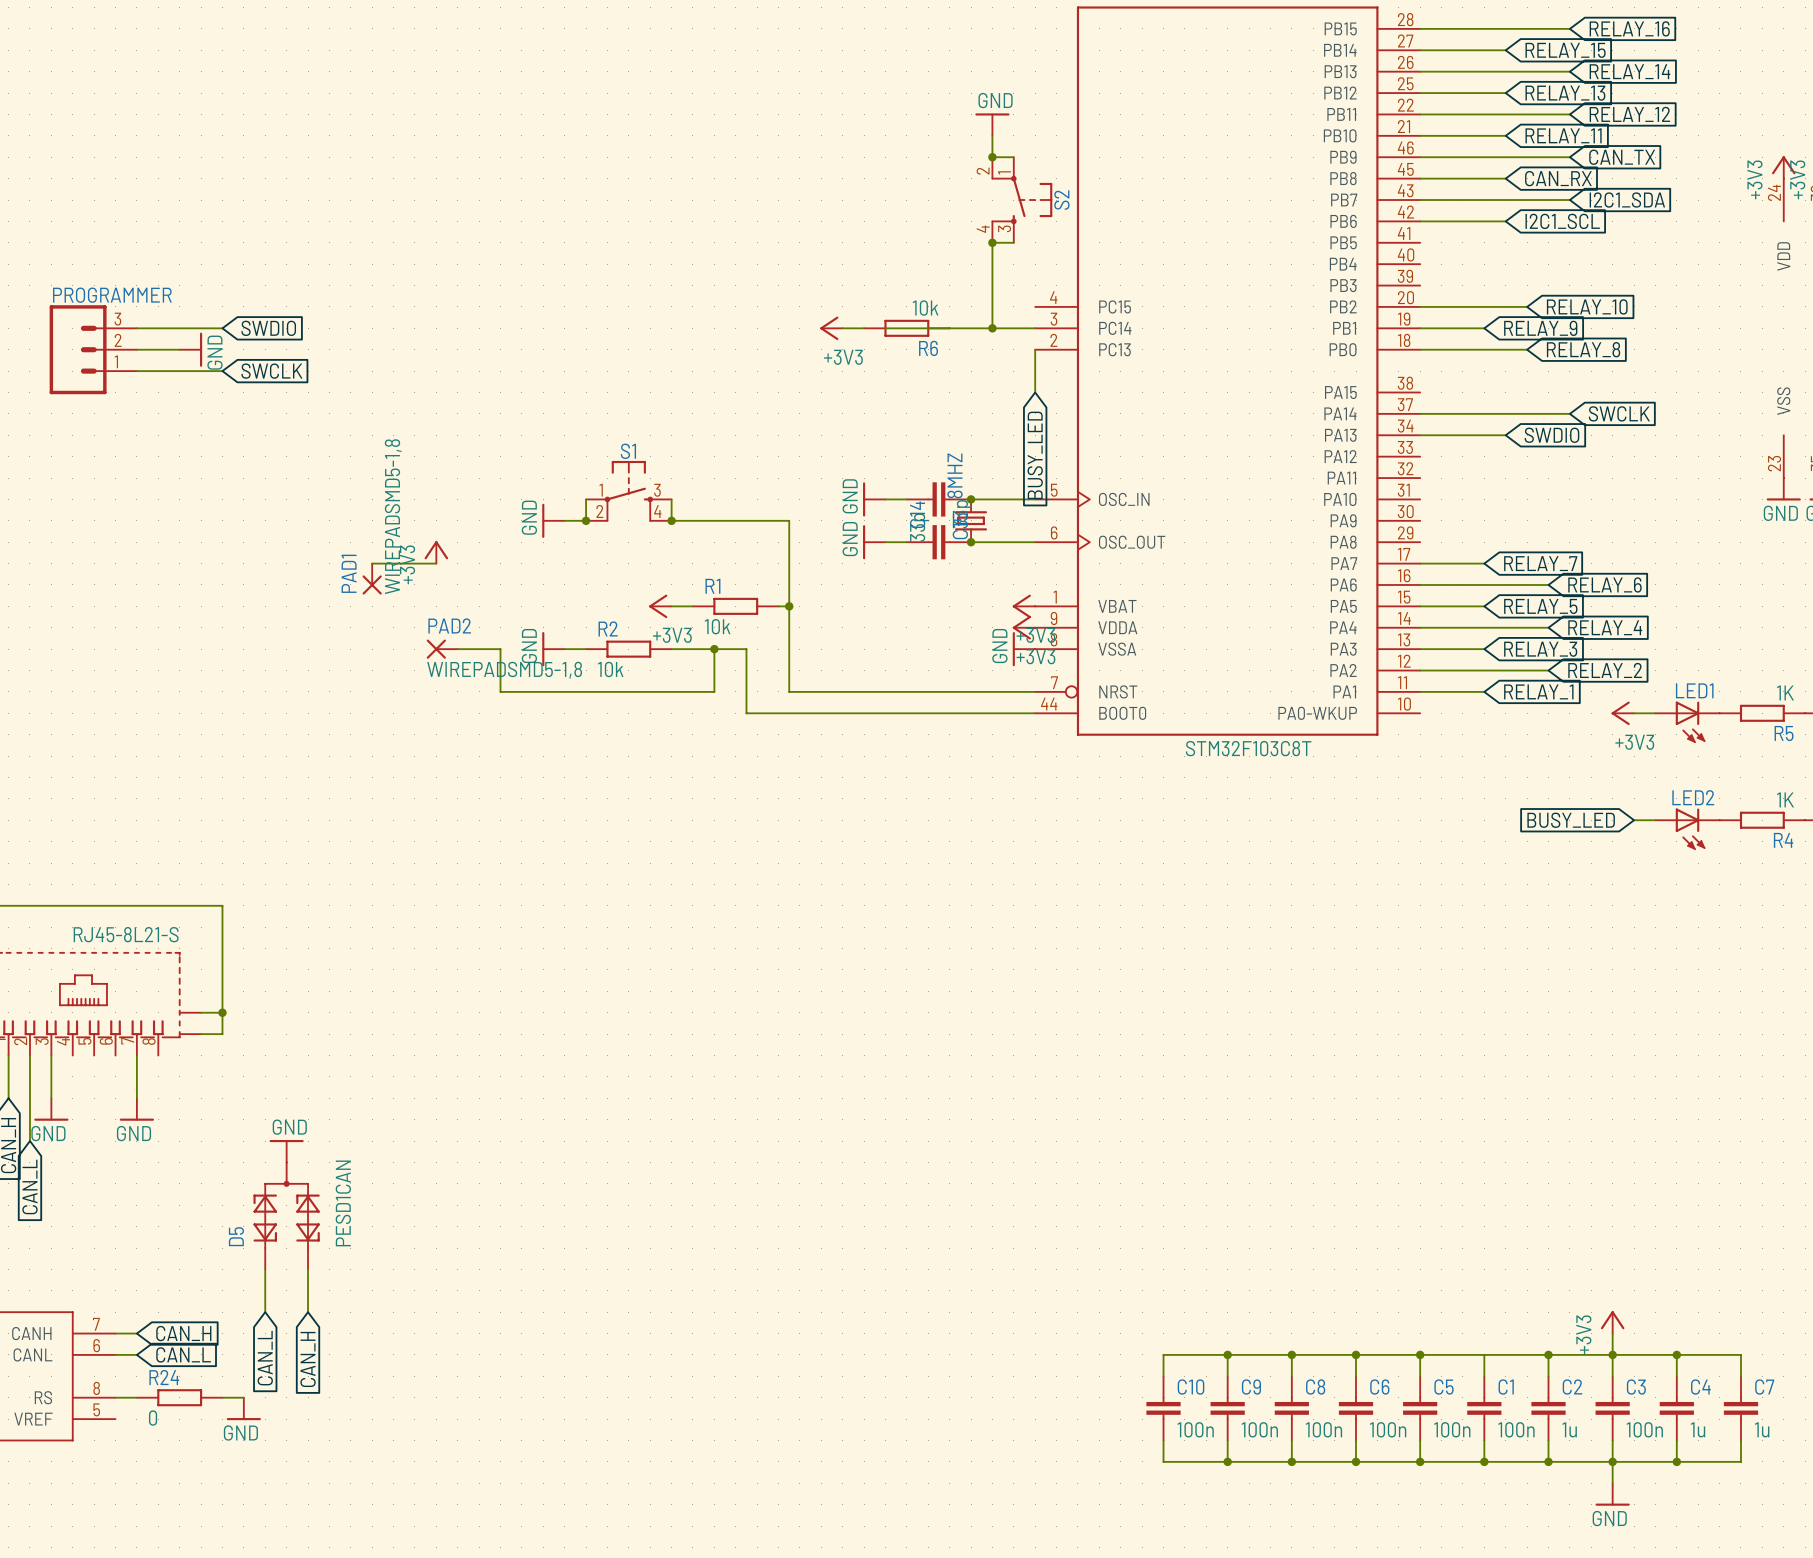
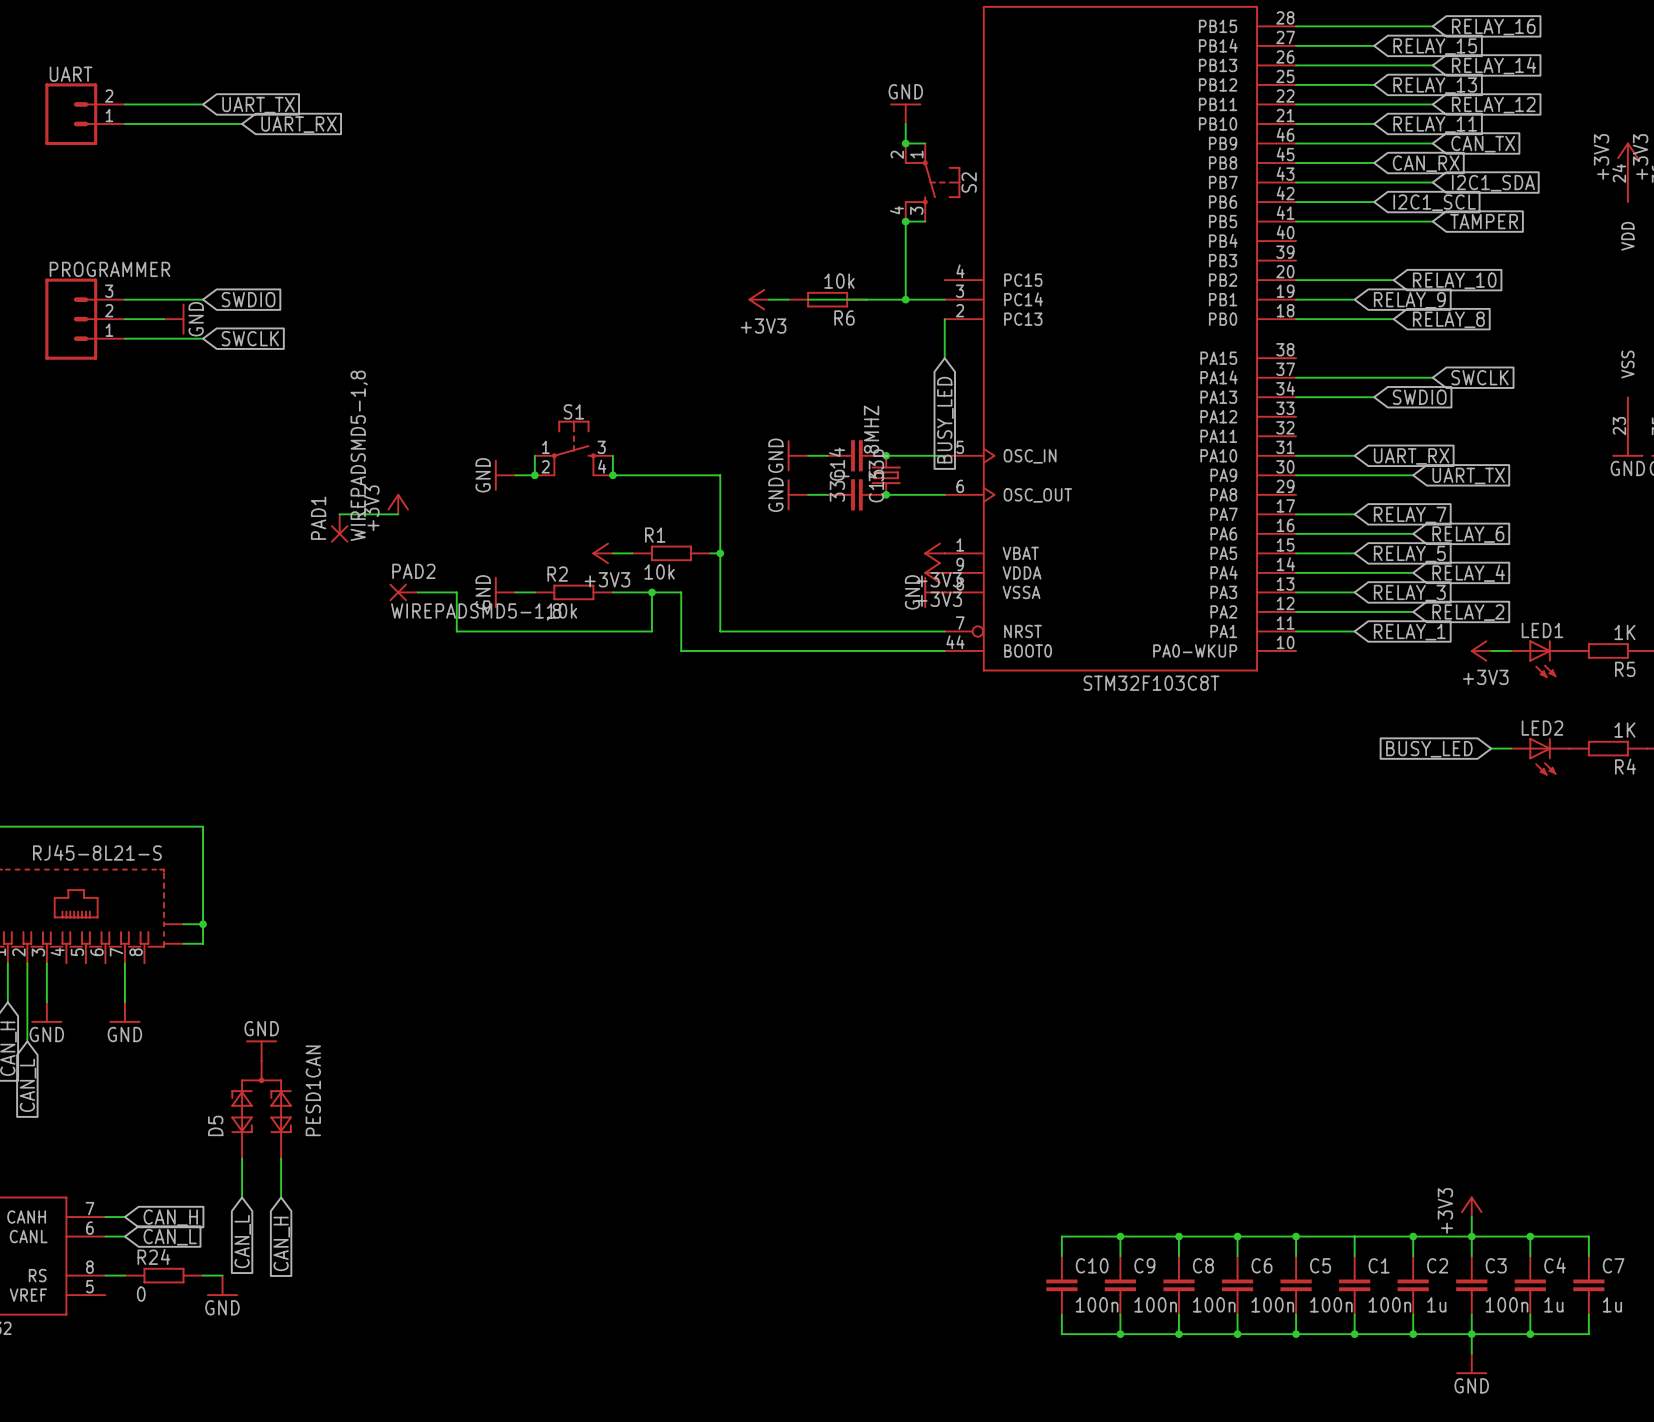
wire: none -> (124, 104) (203, 104)
global label: none -> UART_TX (258, 105)
UART: none -> (85, 114)
wire: none -> (124, 123) (242, 123)
global label: none -> UART_RX (299, 124)
wire: none -> (1296, 221) (1432, 221)
global label: none -> TAMPER (1484, 221)
wire: none -> (1296, 455) (1354, 455)
global label: none -> UART_RX (1411, 456)
wire: none -> (1296, 475) (1413, 475)
global label: none -> UART_TX (1468, 475)

